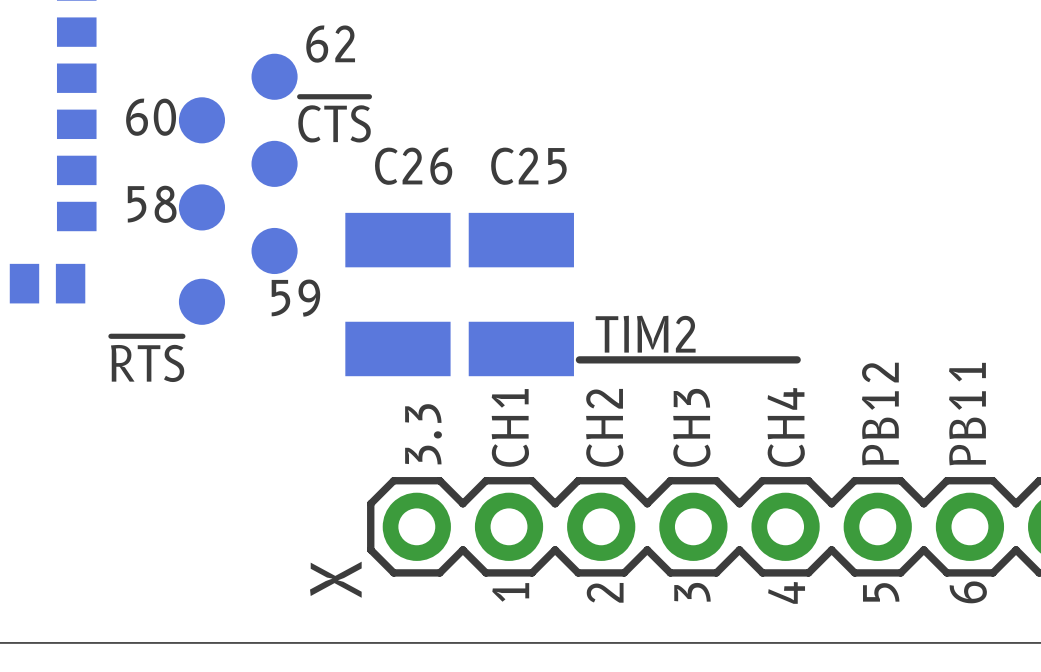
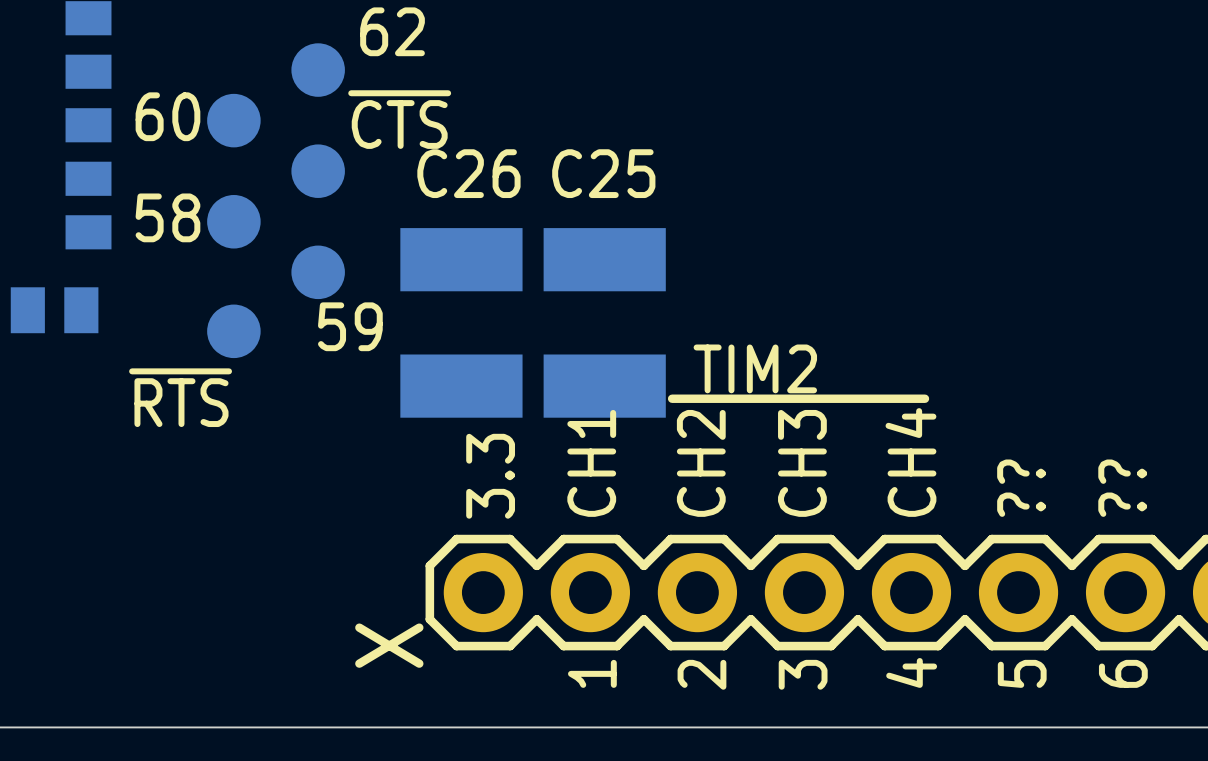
text: PB12 (880, 414) -> ?? (1021, 488)
text: PB11 (967, 414) -> ?? (1122, 488)

